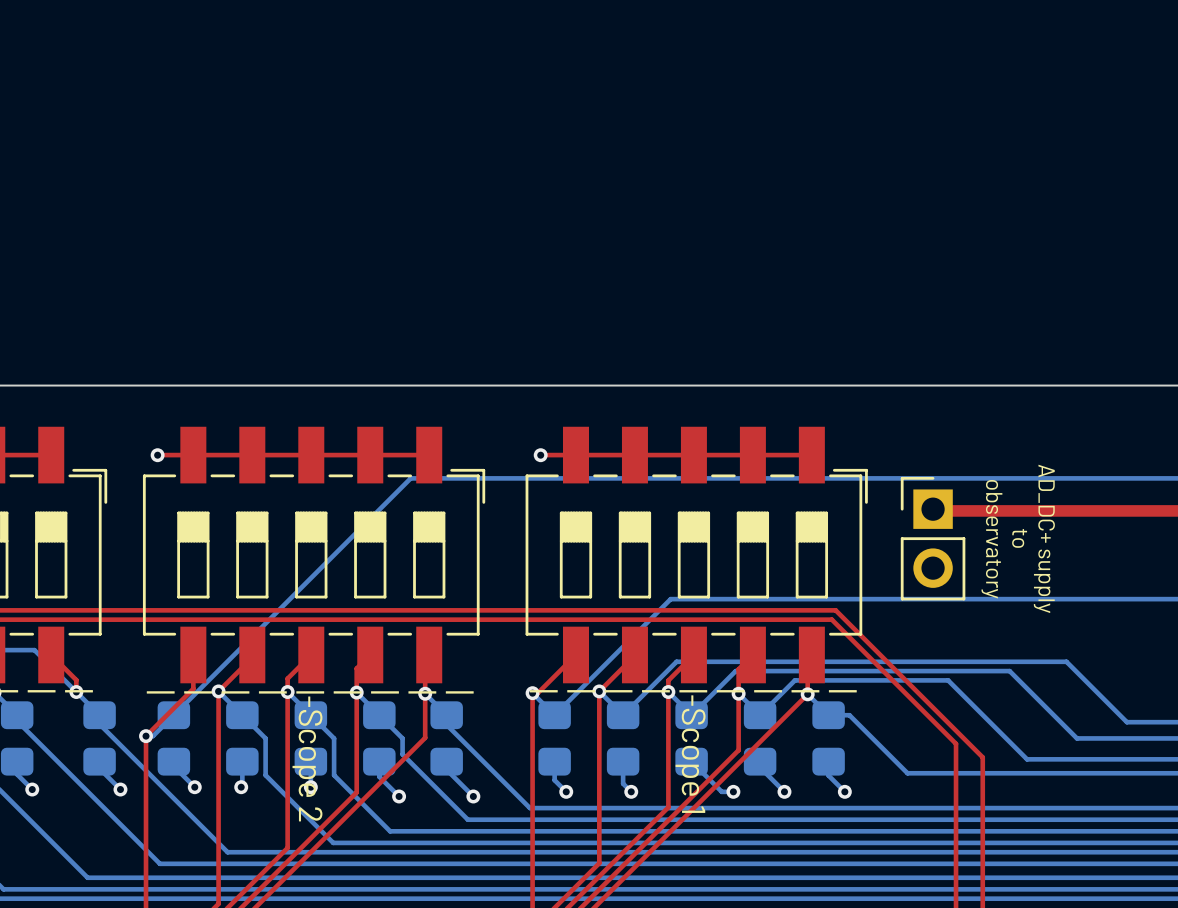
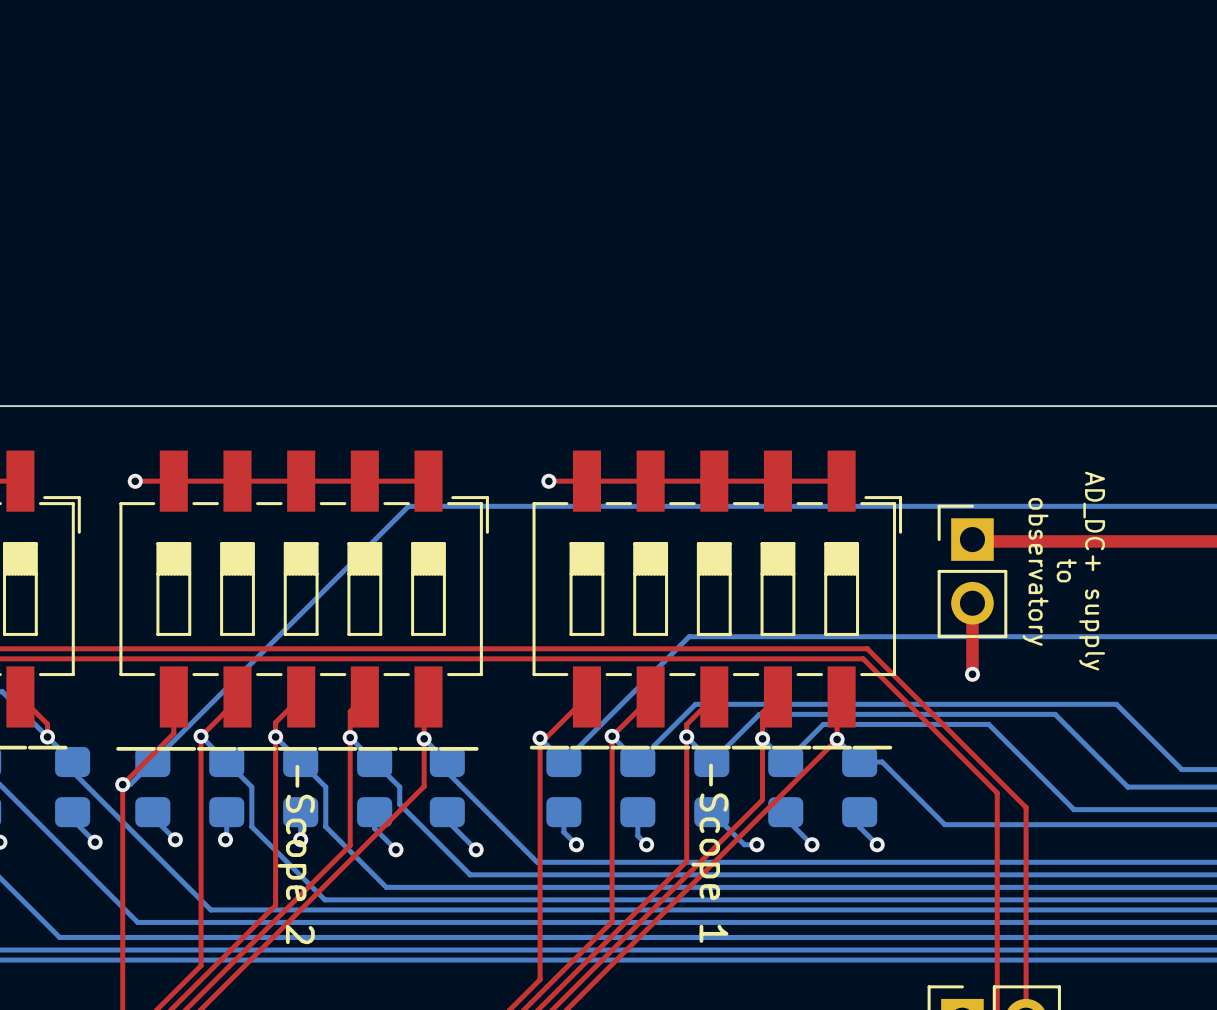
top track: none -> (972, 615) (972, 674)
via: none -> (972, 674)

